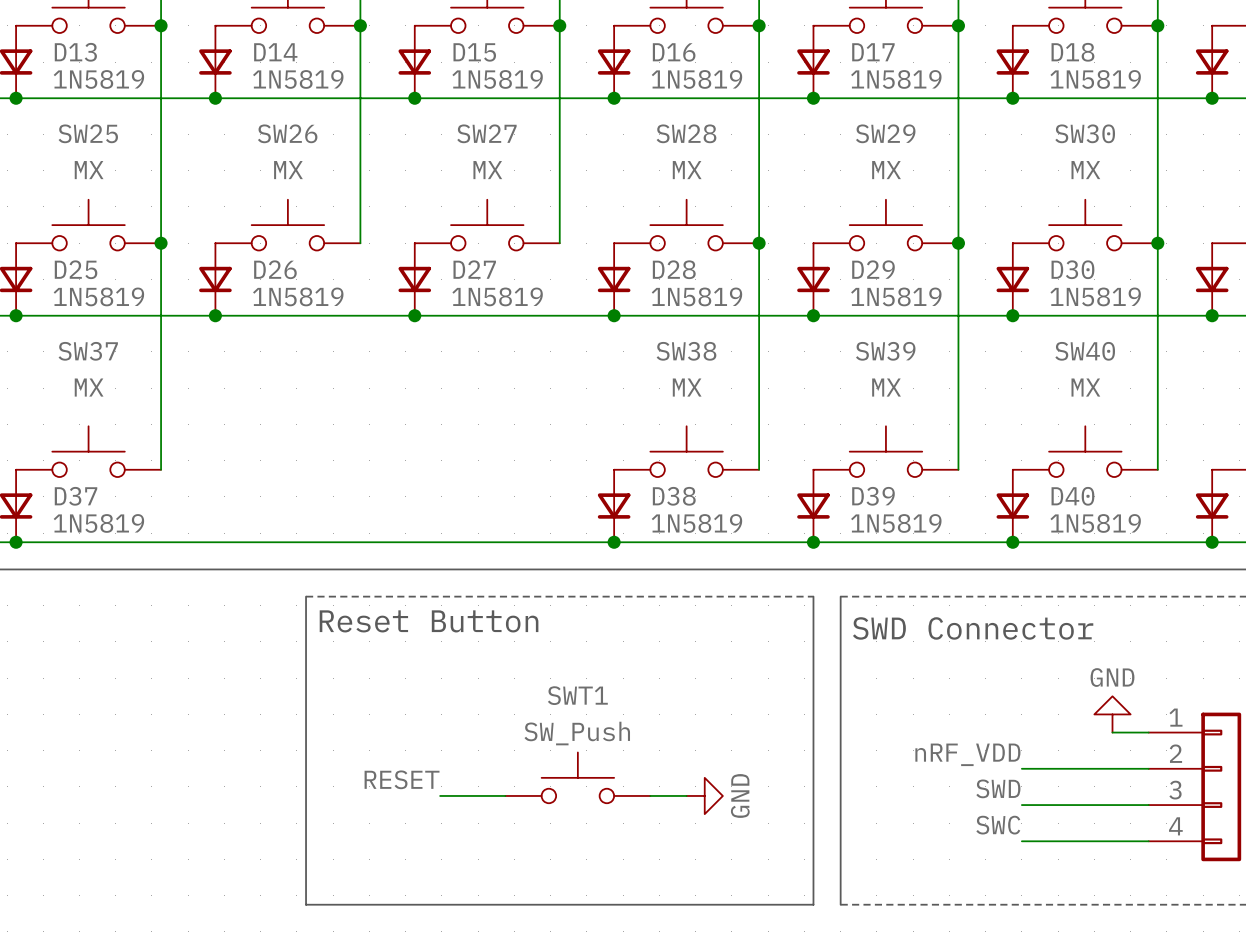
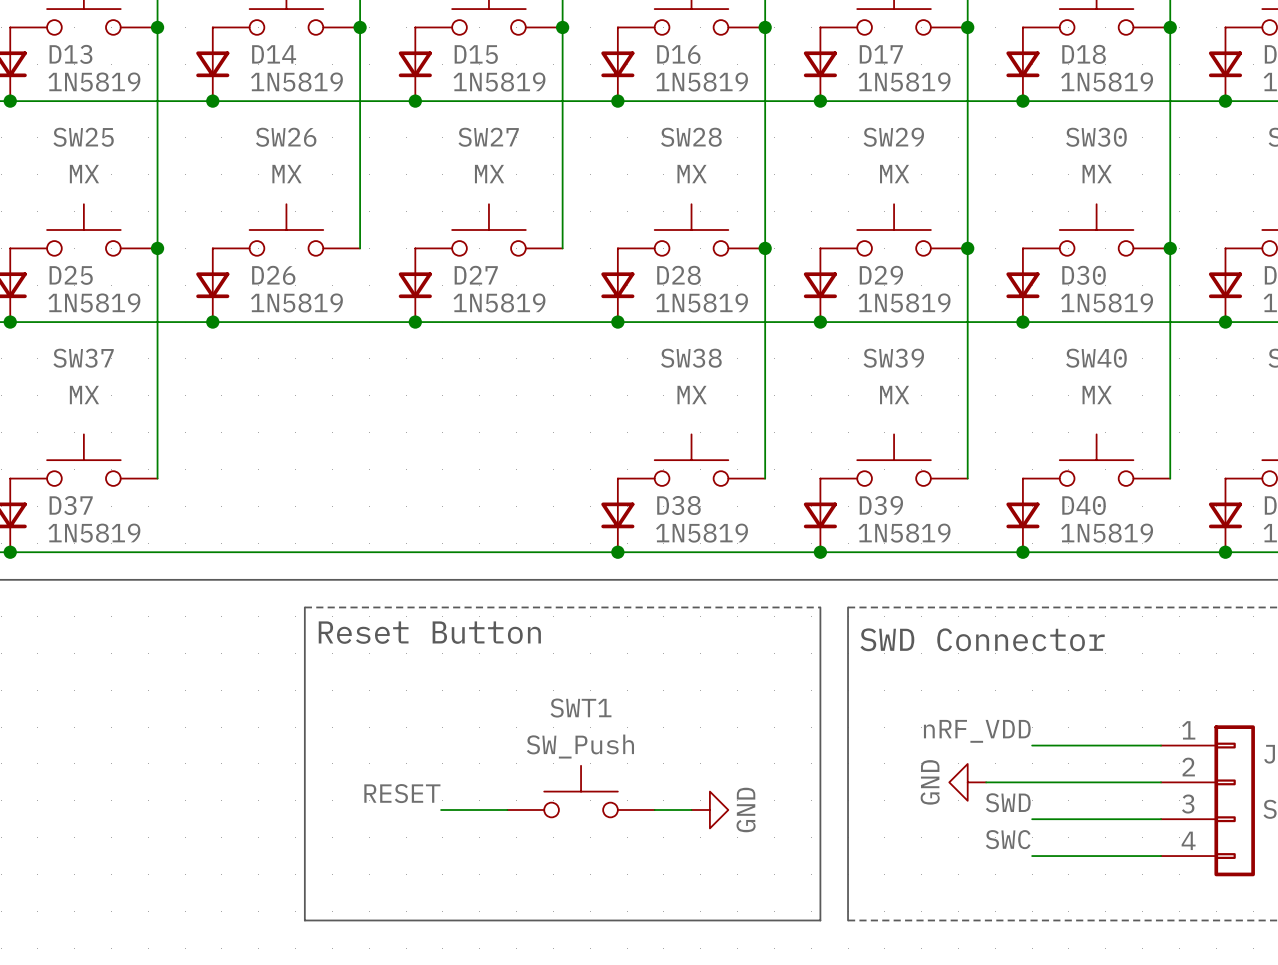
power symbol rotation: 0° (1112, 714) -> 90° counterclockwise (967, 782)
power symbol position: GND (1112, 714) -> GND (967, 782)
wire: none -> (1032, 745) (1124, 745)
label position: nRF_VDD (967, 754) -> nRF_VDD (977, 731)
wire: none -> (986, 782) (1032, 782)

